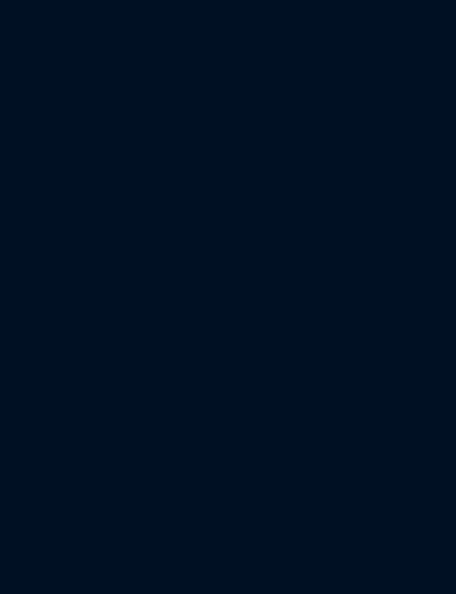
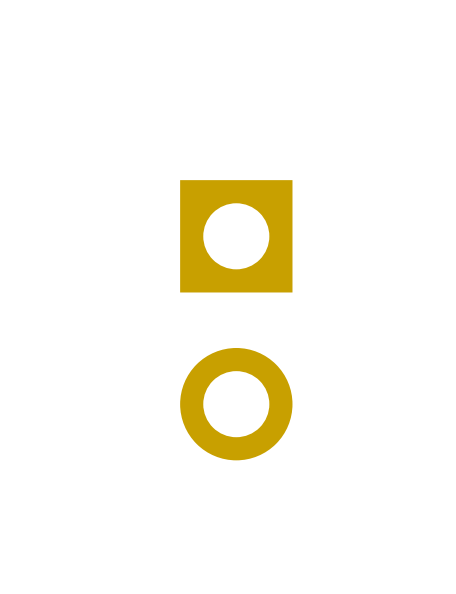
part: none -> (236, 320)

